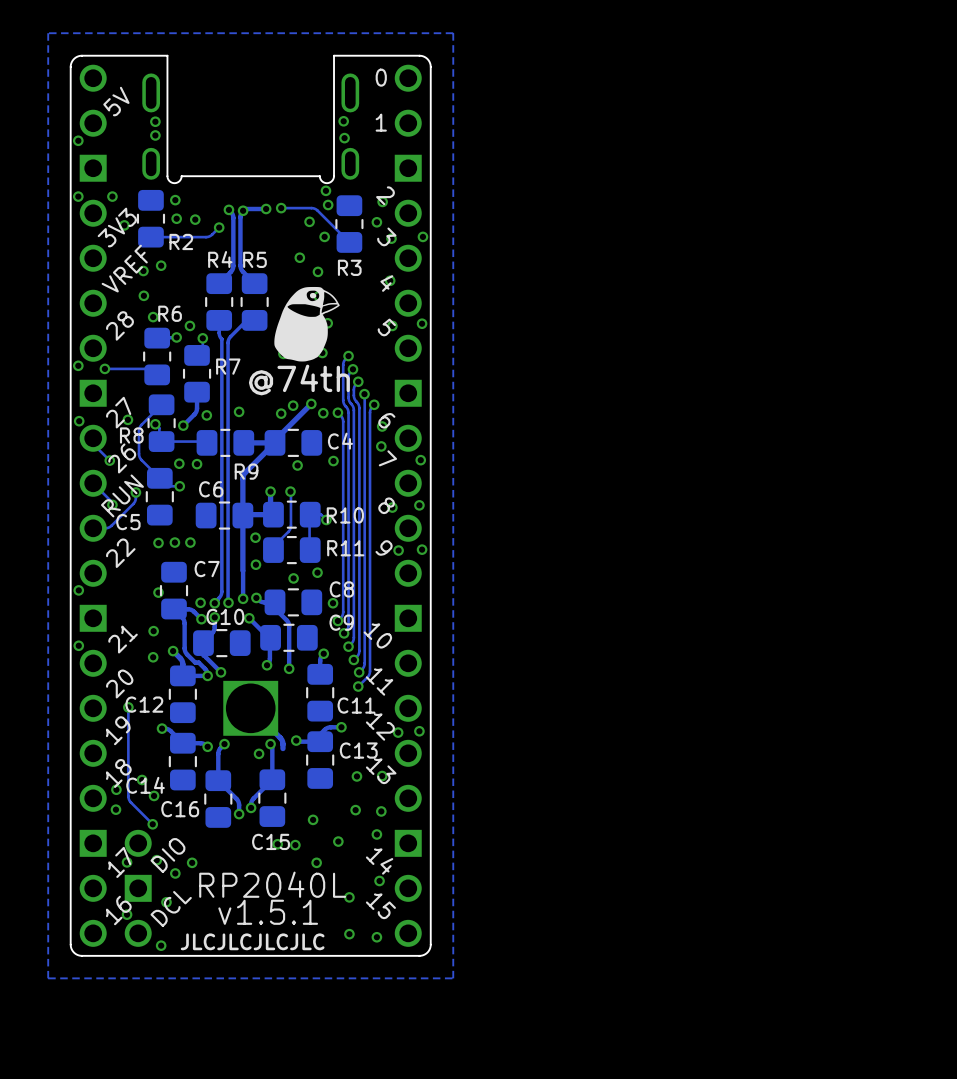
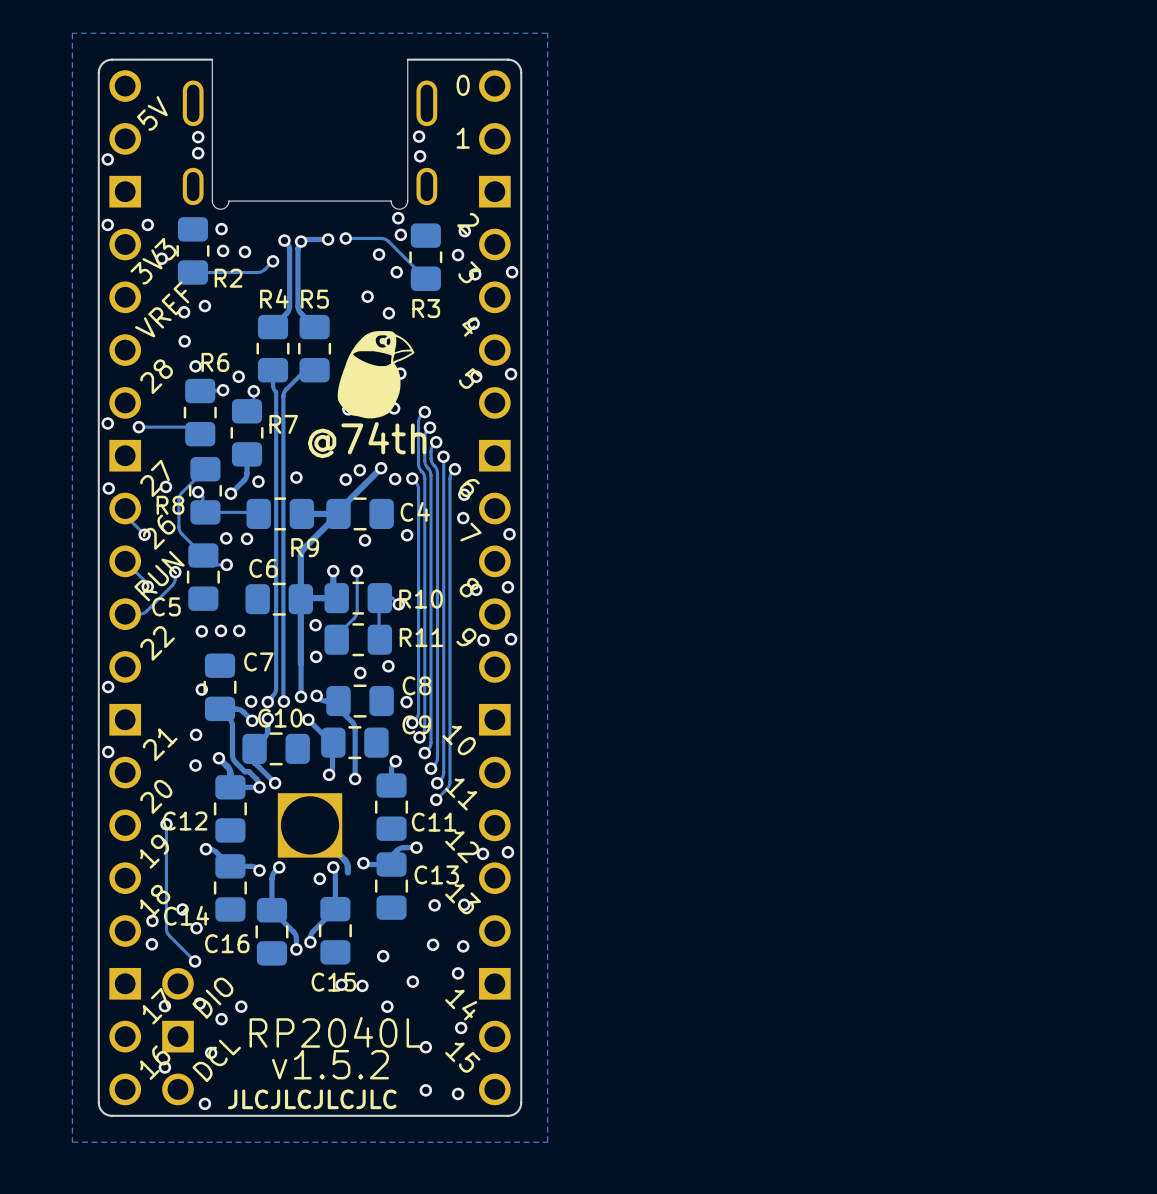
text: v1.5.1 (268, 912) -> v1.5.2 (330, 1064)

